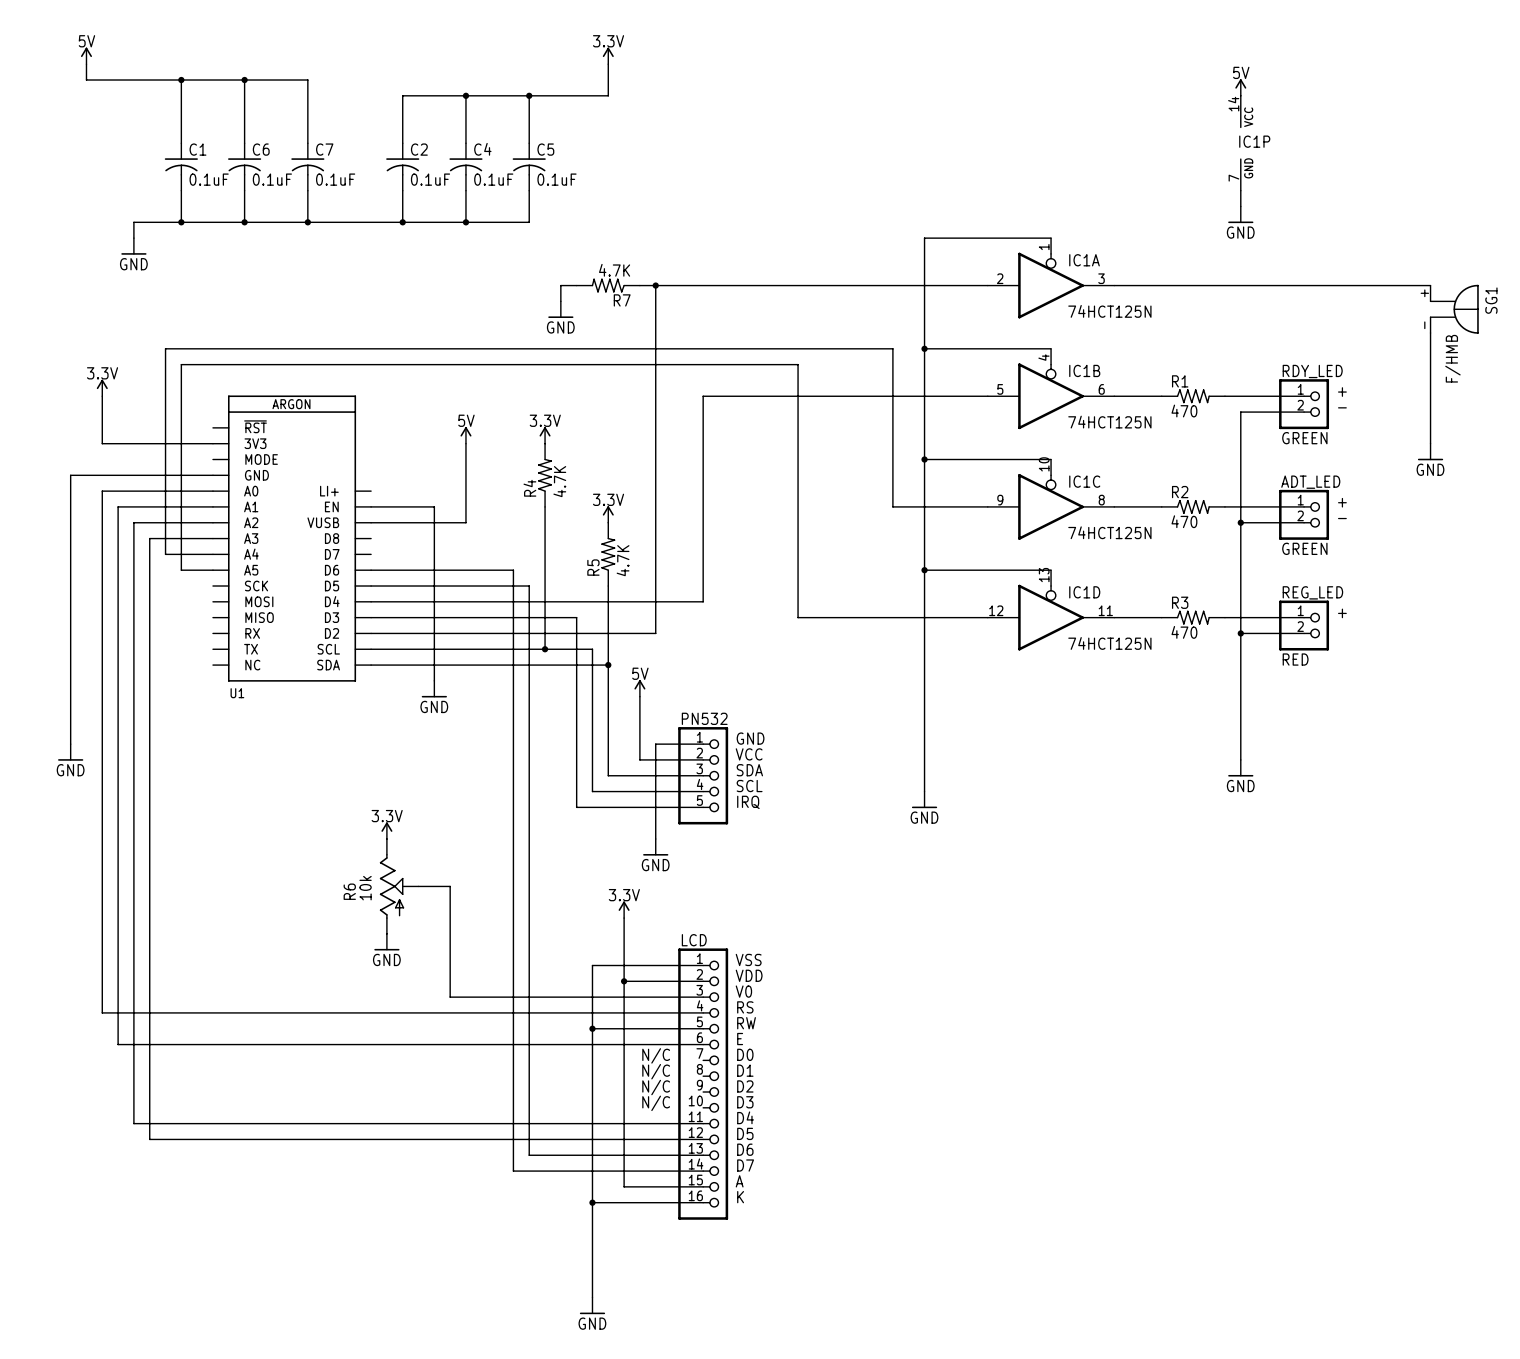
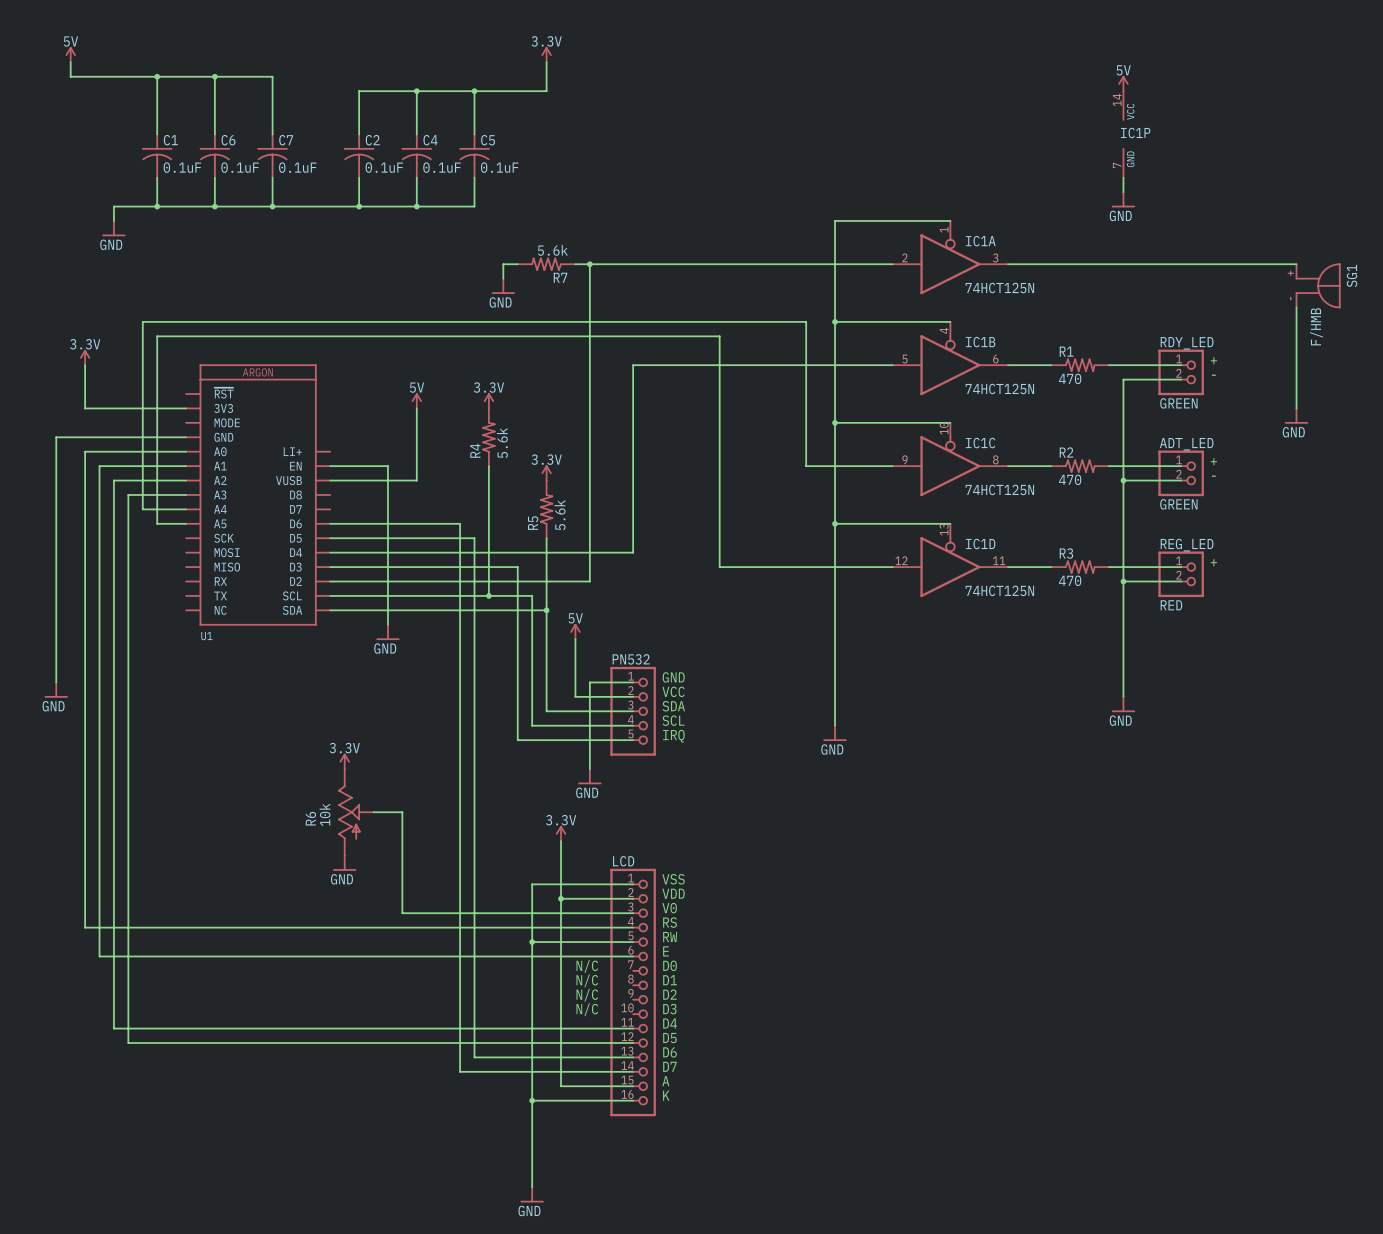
R7 value: 4.7K (614, 270) -> 5.6k (552, 250)
R4 value: 4.7K (559, 481) -> 5.6k (502, 442)
R5 value: 4.7K (623, 560) -> 5.6k (560, 515)

